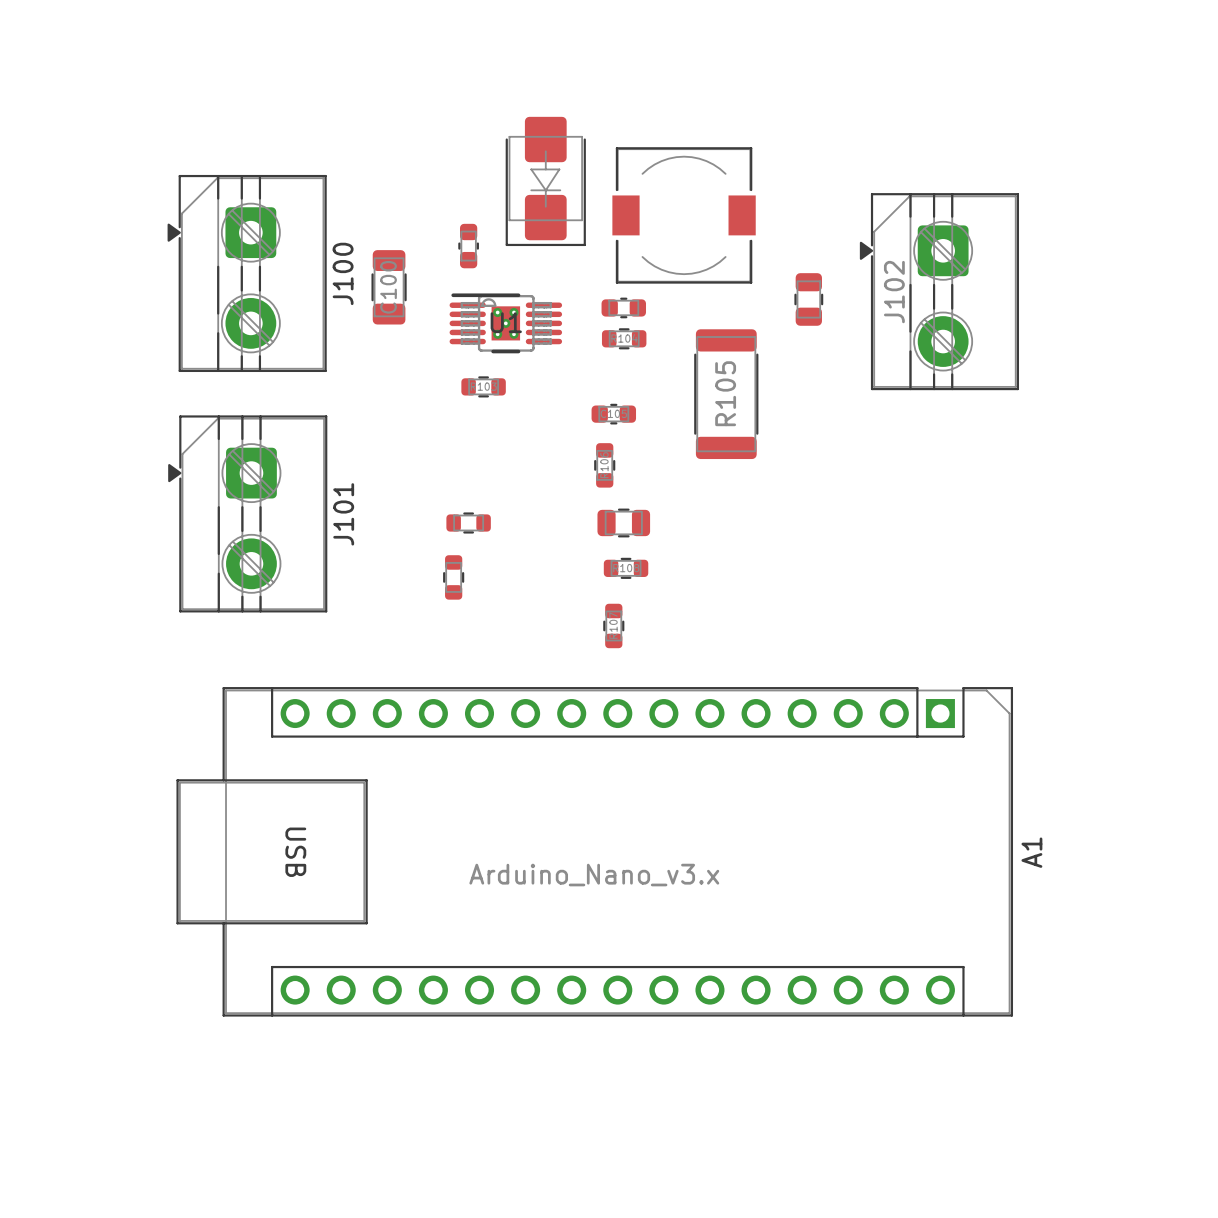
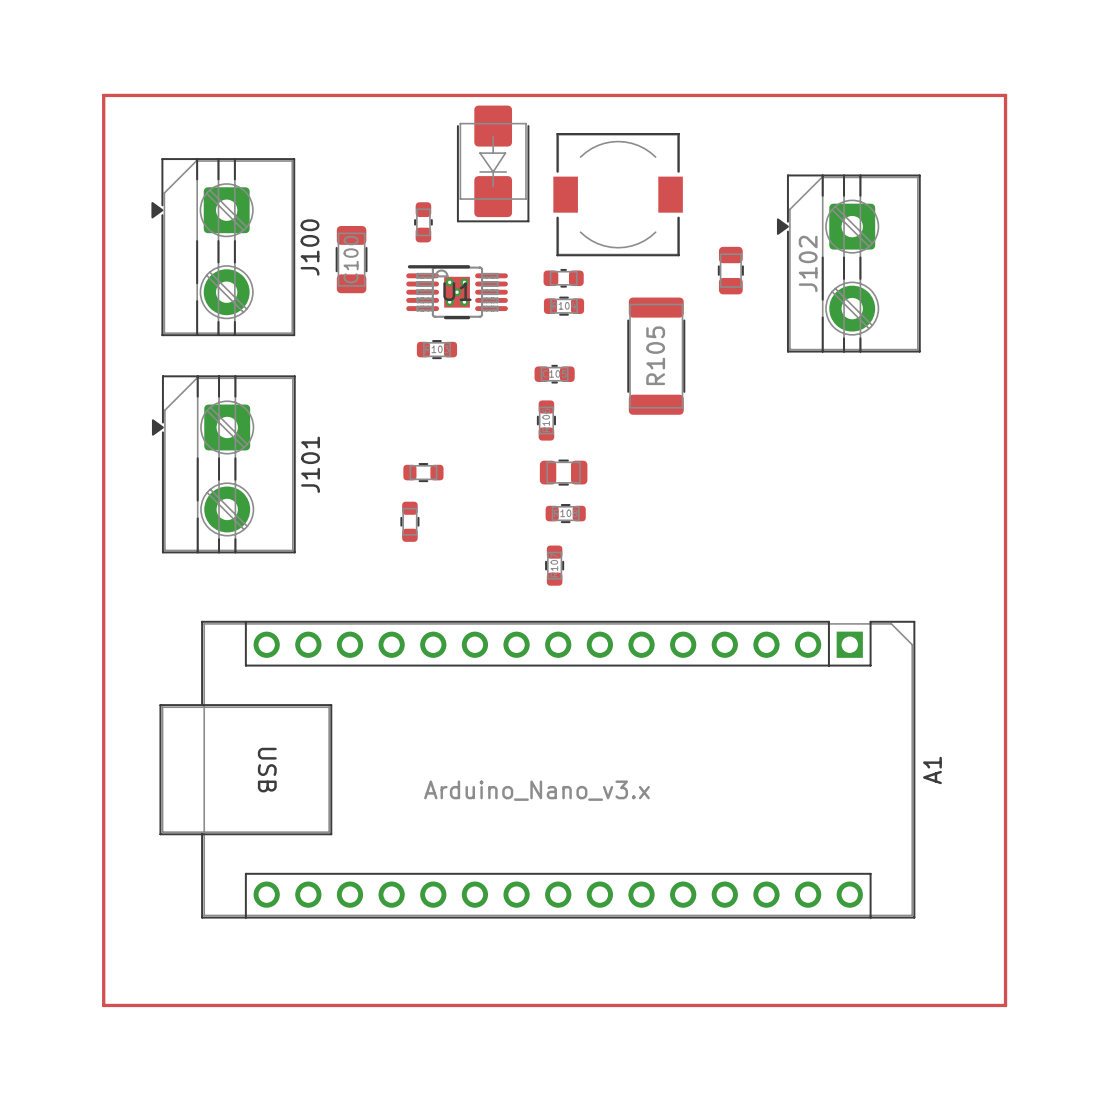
track: none -> (103, 95) (1005, 95) (1005, 1005) (103, 1005) (103, 95)

